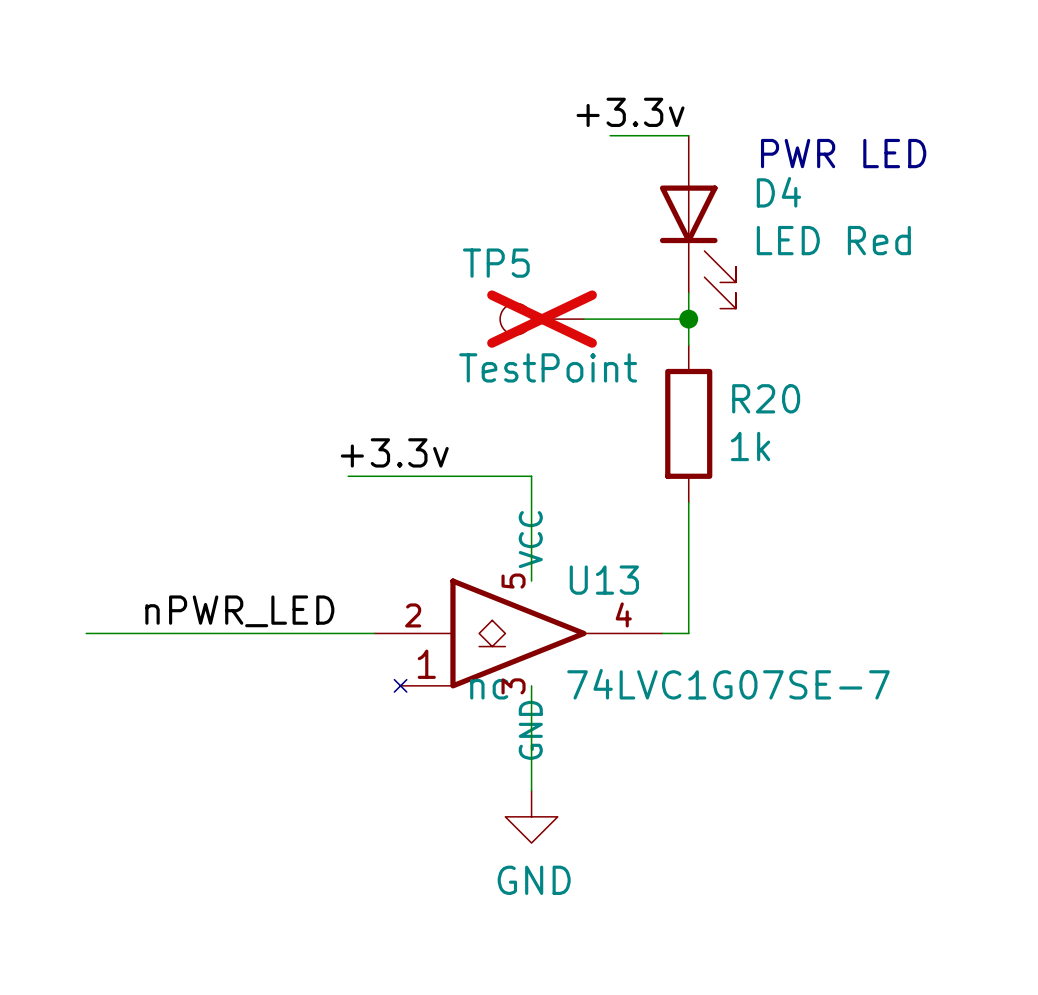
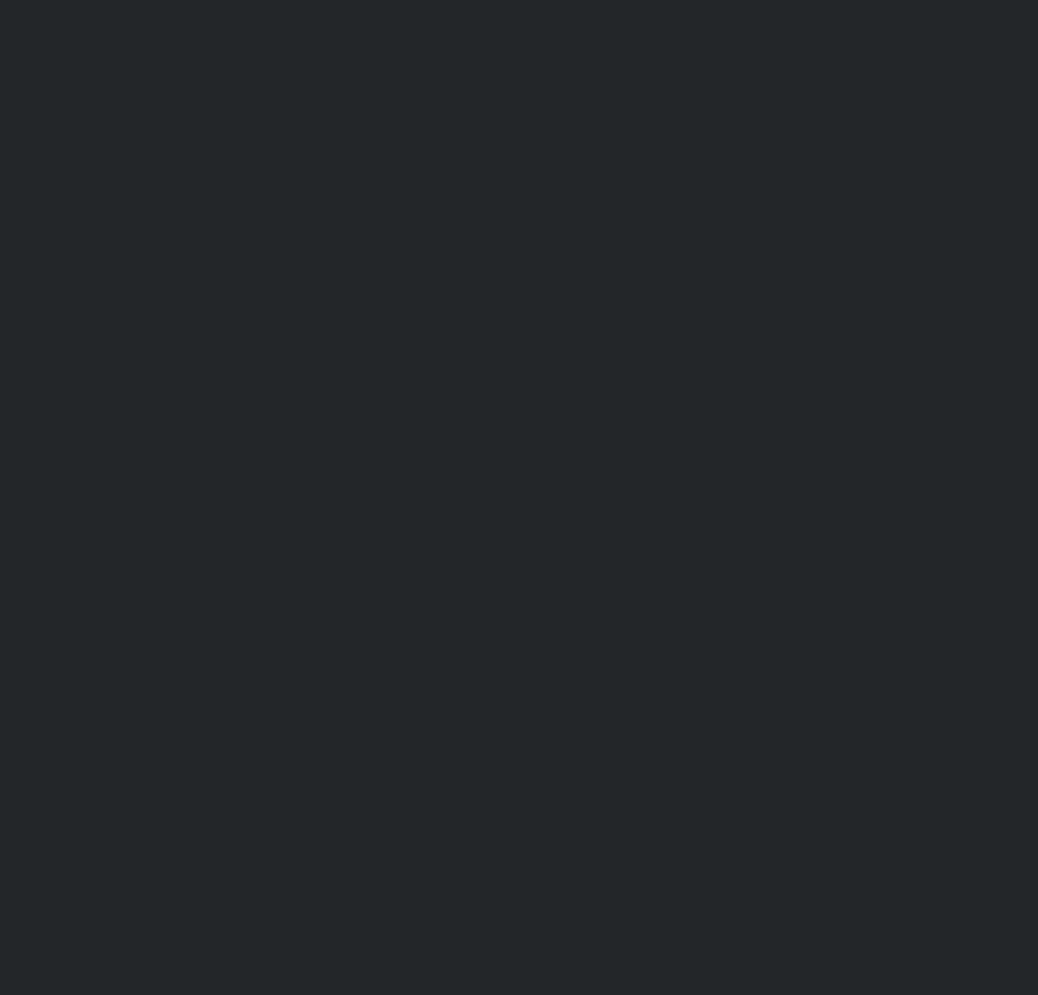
label: +3.3v (630, 112) -> none
wire: (610, 135) (688, 135) -> none
text: PWR LED (843, 153) -> none
D4: LED Red (697, 222) -> none
wire: (688, 292) (688, 345) -> none
TP5: TestPoint (542, 319) -> none
wire: (583, 319) (688, 319) -> none
junction: (688, 319) -> none
R20: 1k (688, 423) -> none
label: +3.3v (394, 452) -> none
wire: (348, 476) (531, 476) (531, 581) -> none
wire: (688, 502) (688, 633) (662, 633) -> none
label: nPWR_LED (239, 611) -> none
wire: (86, 633) (374, 633) -> none
U13: 74LVC1G07SE-7 (518, 635) -> none
wire: (531, 685) (531, 790) -> none
power symbol: GND (531, 816) -> none

